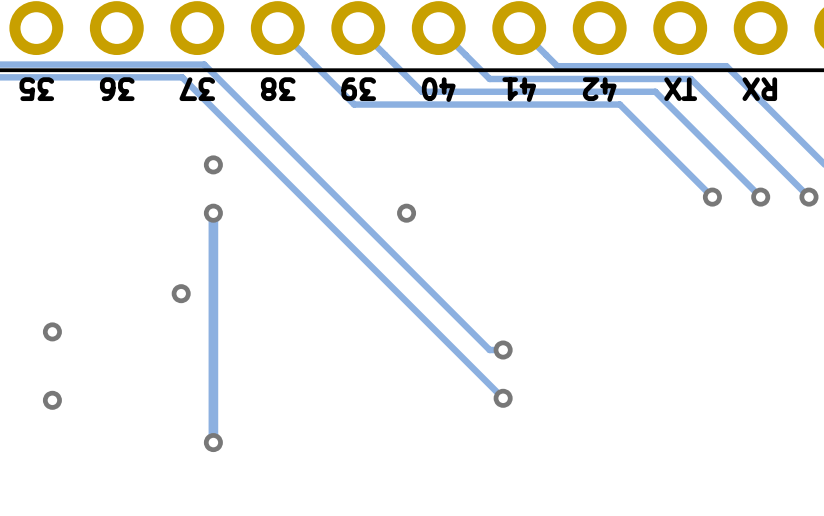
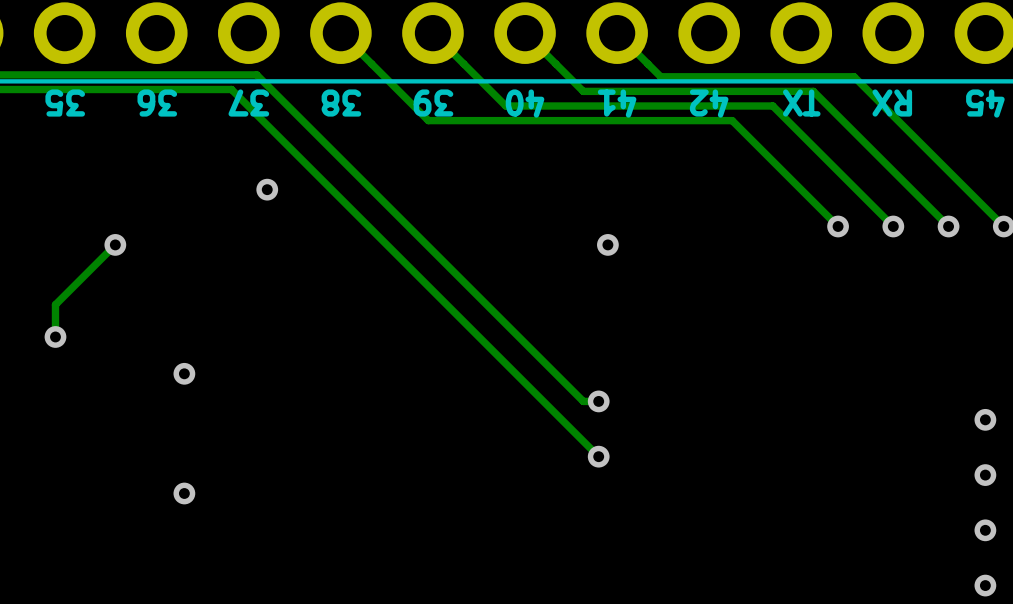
track: none -> (115, 244) (55, 304) (55, 336)
via: none -> (115, 244)
track: (213, 213) (213, 442) -> none
via: (213, 213) -> none
via position: (406, 213) -> (607, 244)
via: none -> (55, 336)
via: (181, 293) -> none
via: none -> (184, 373)
via: (52, 331) -> none
via: (52, 400) -> none
via: none -> (184, 493)
via: (213, 442) -> none

